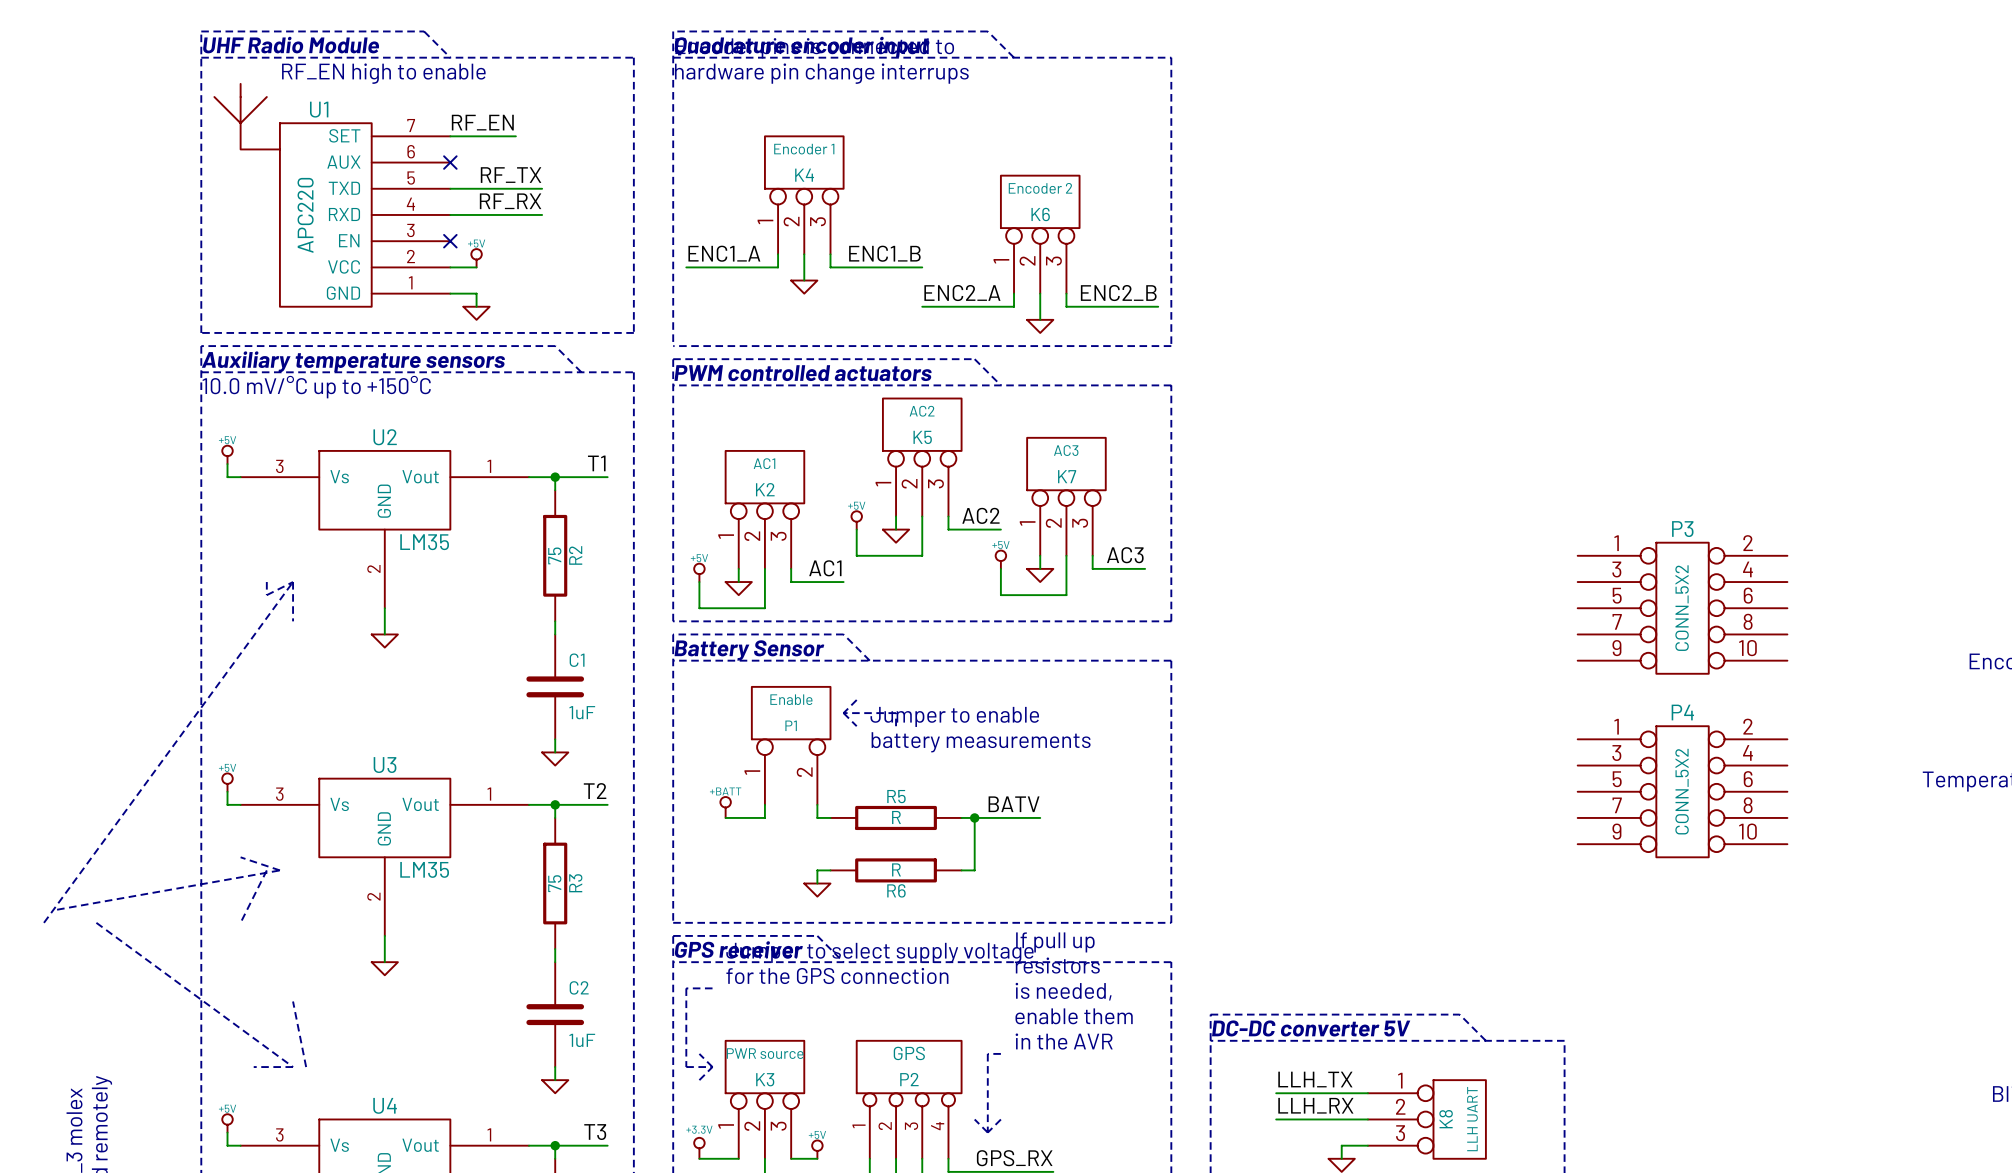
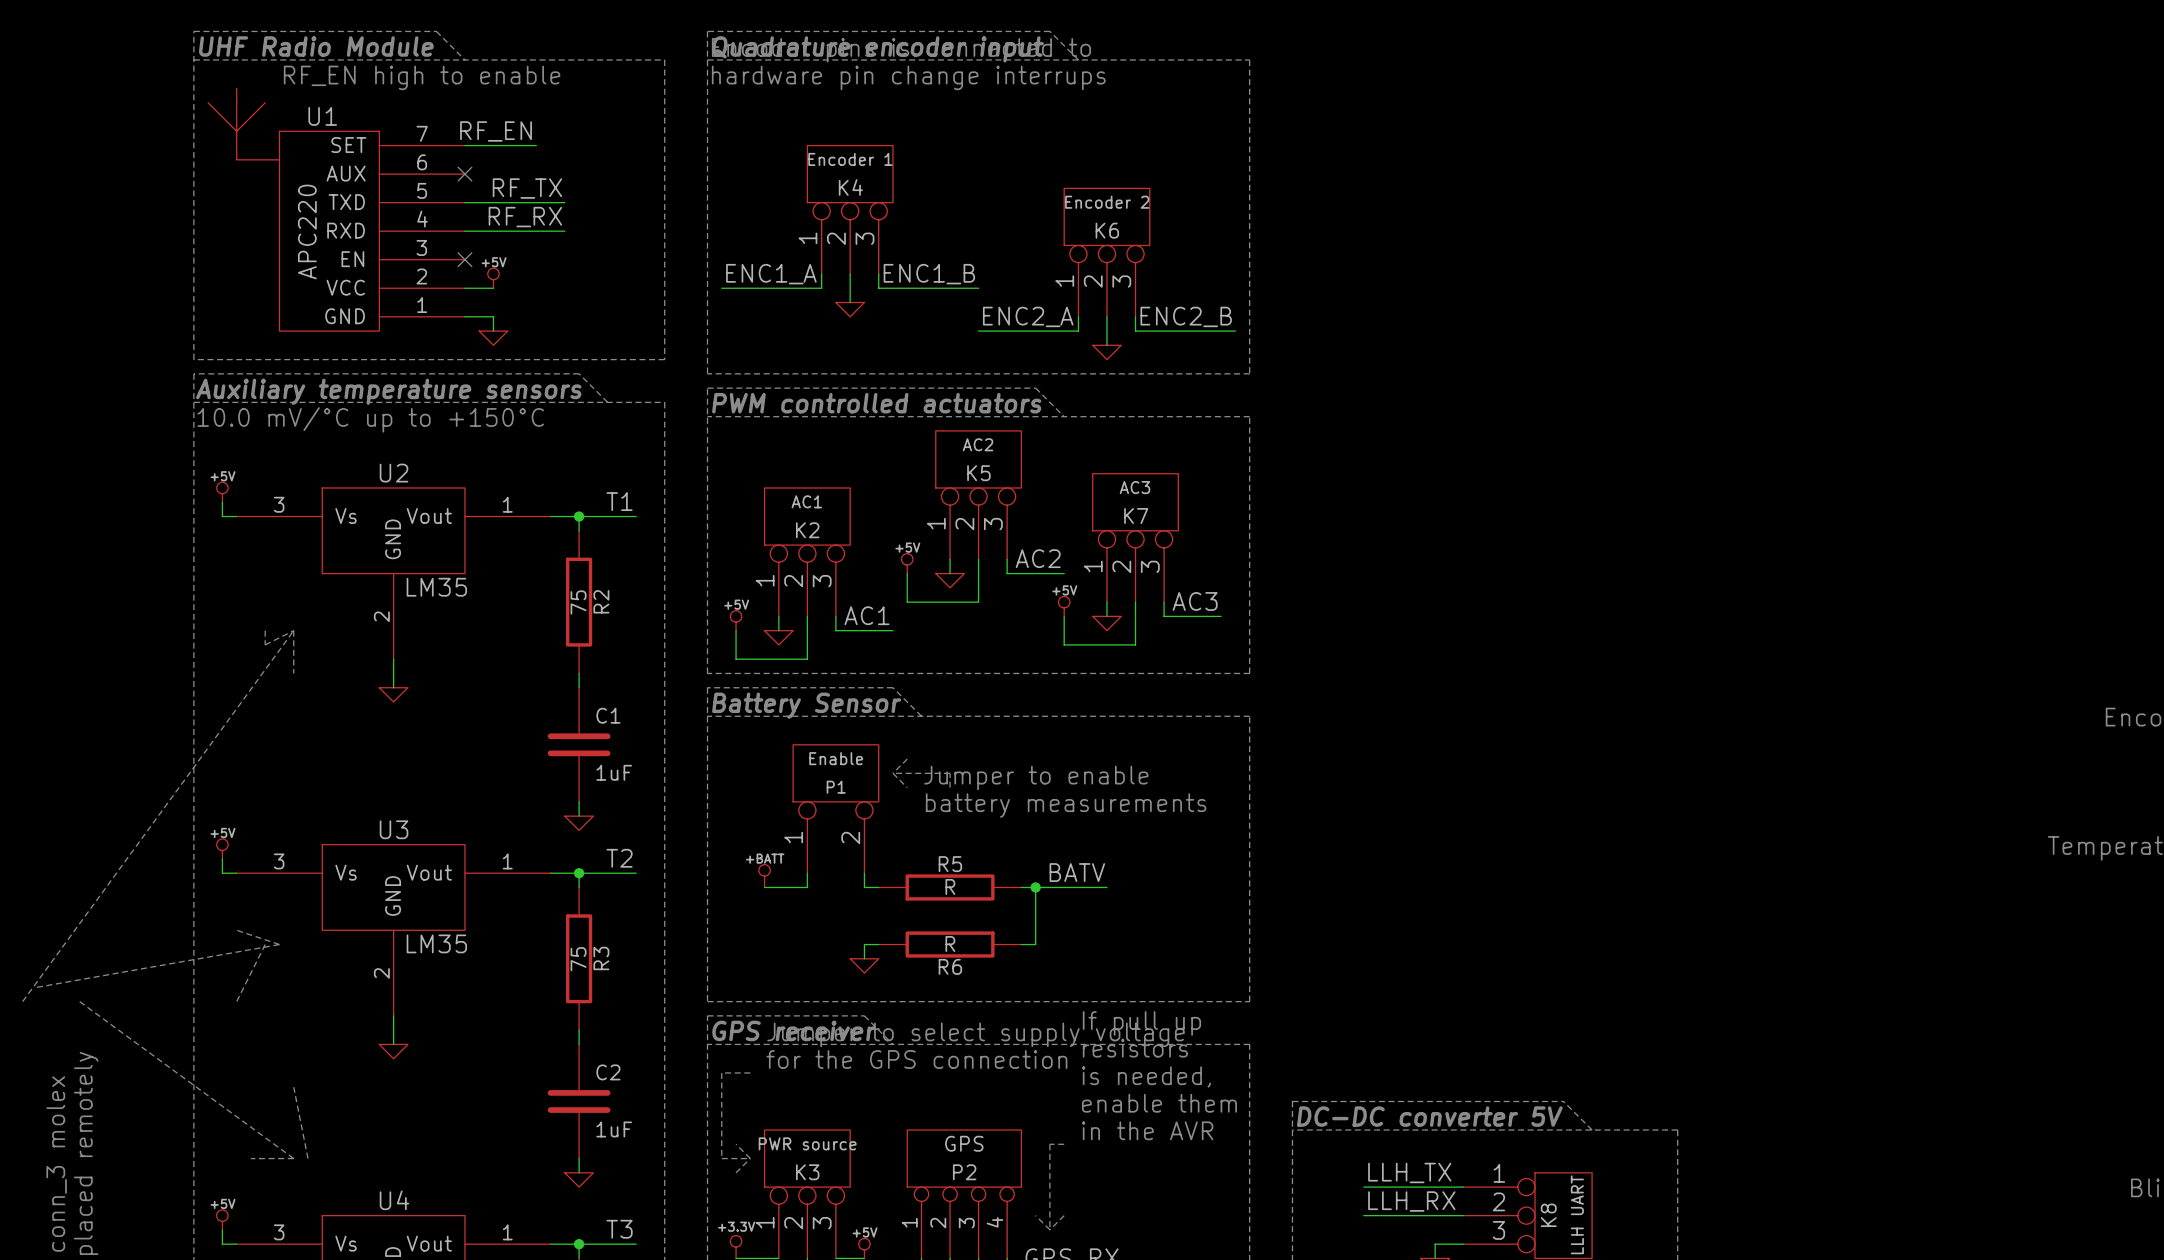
P3: CONN_5X2 (1682, 608) -> none
P4: CONN_5X2 (1682, 791) -> none

